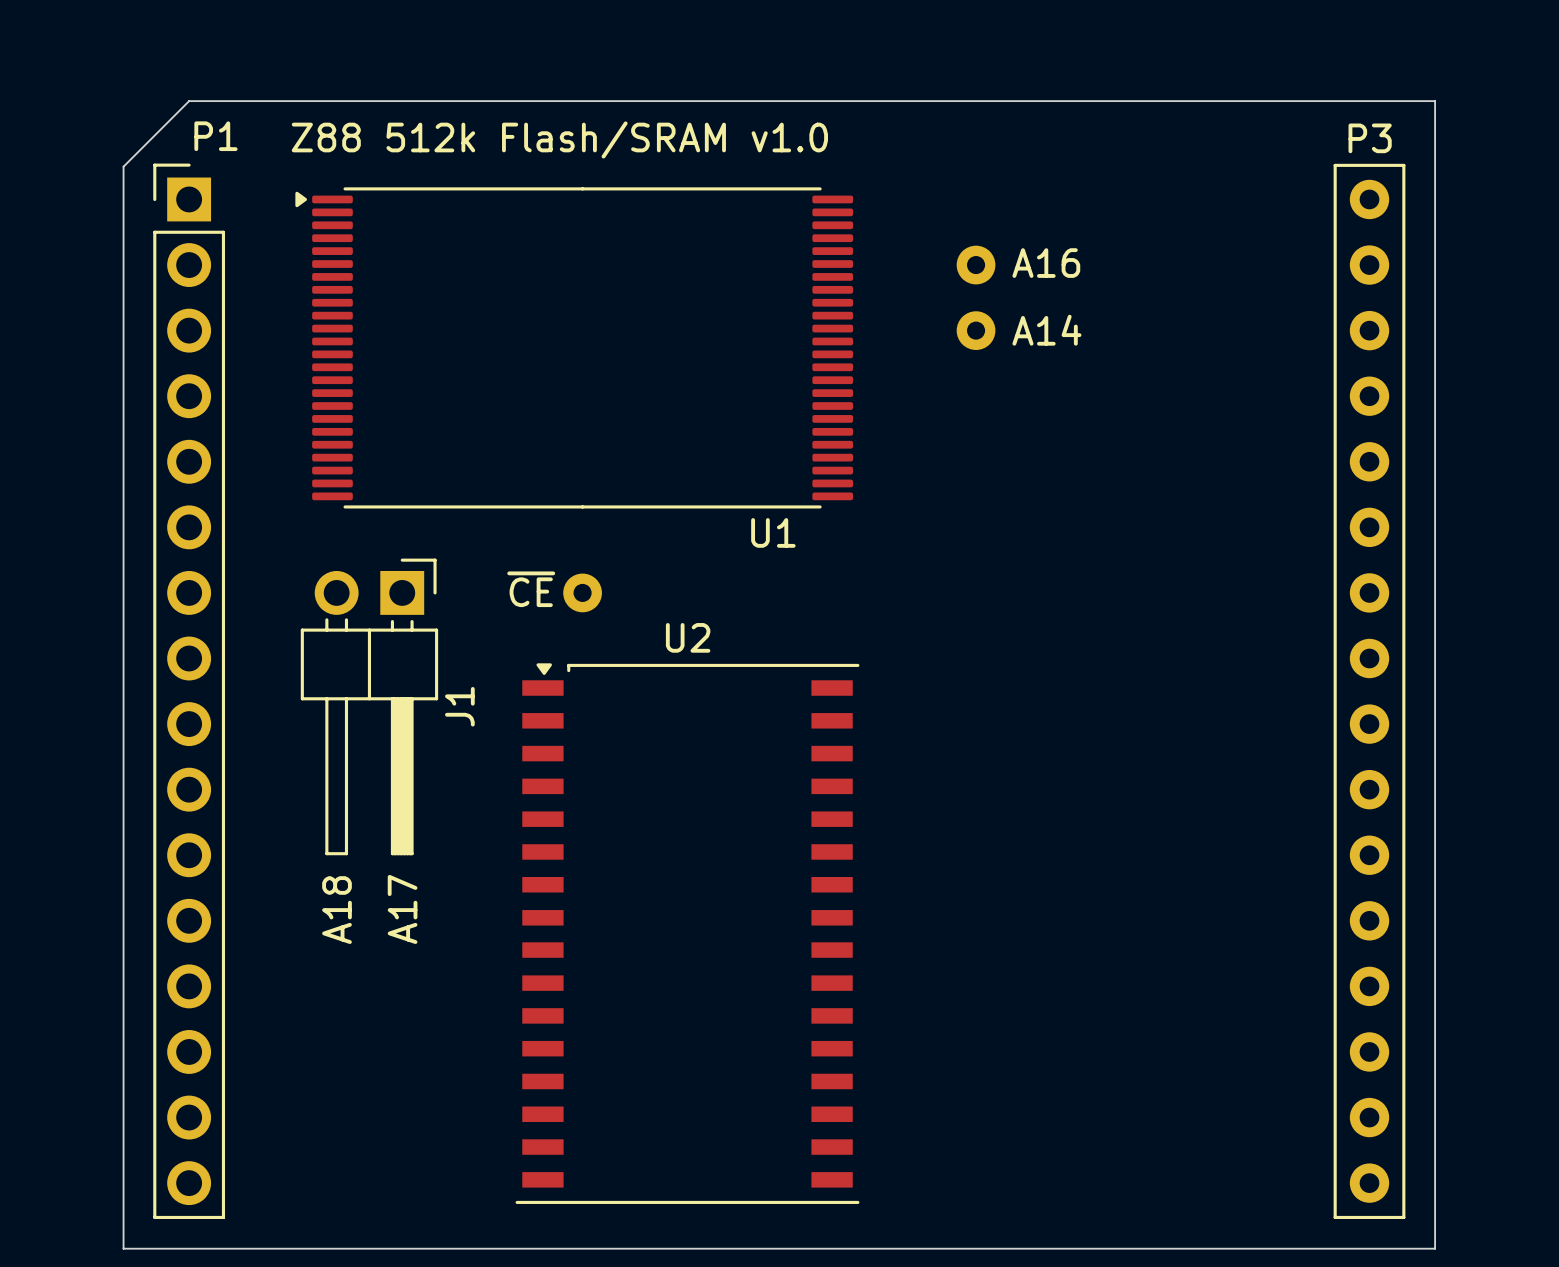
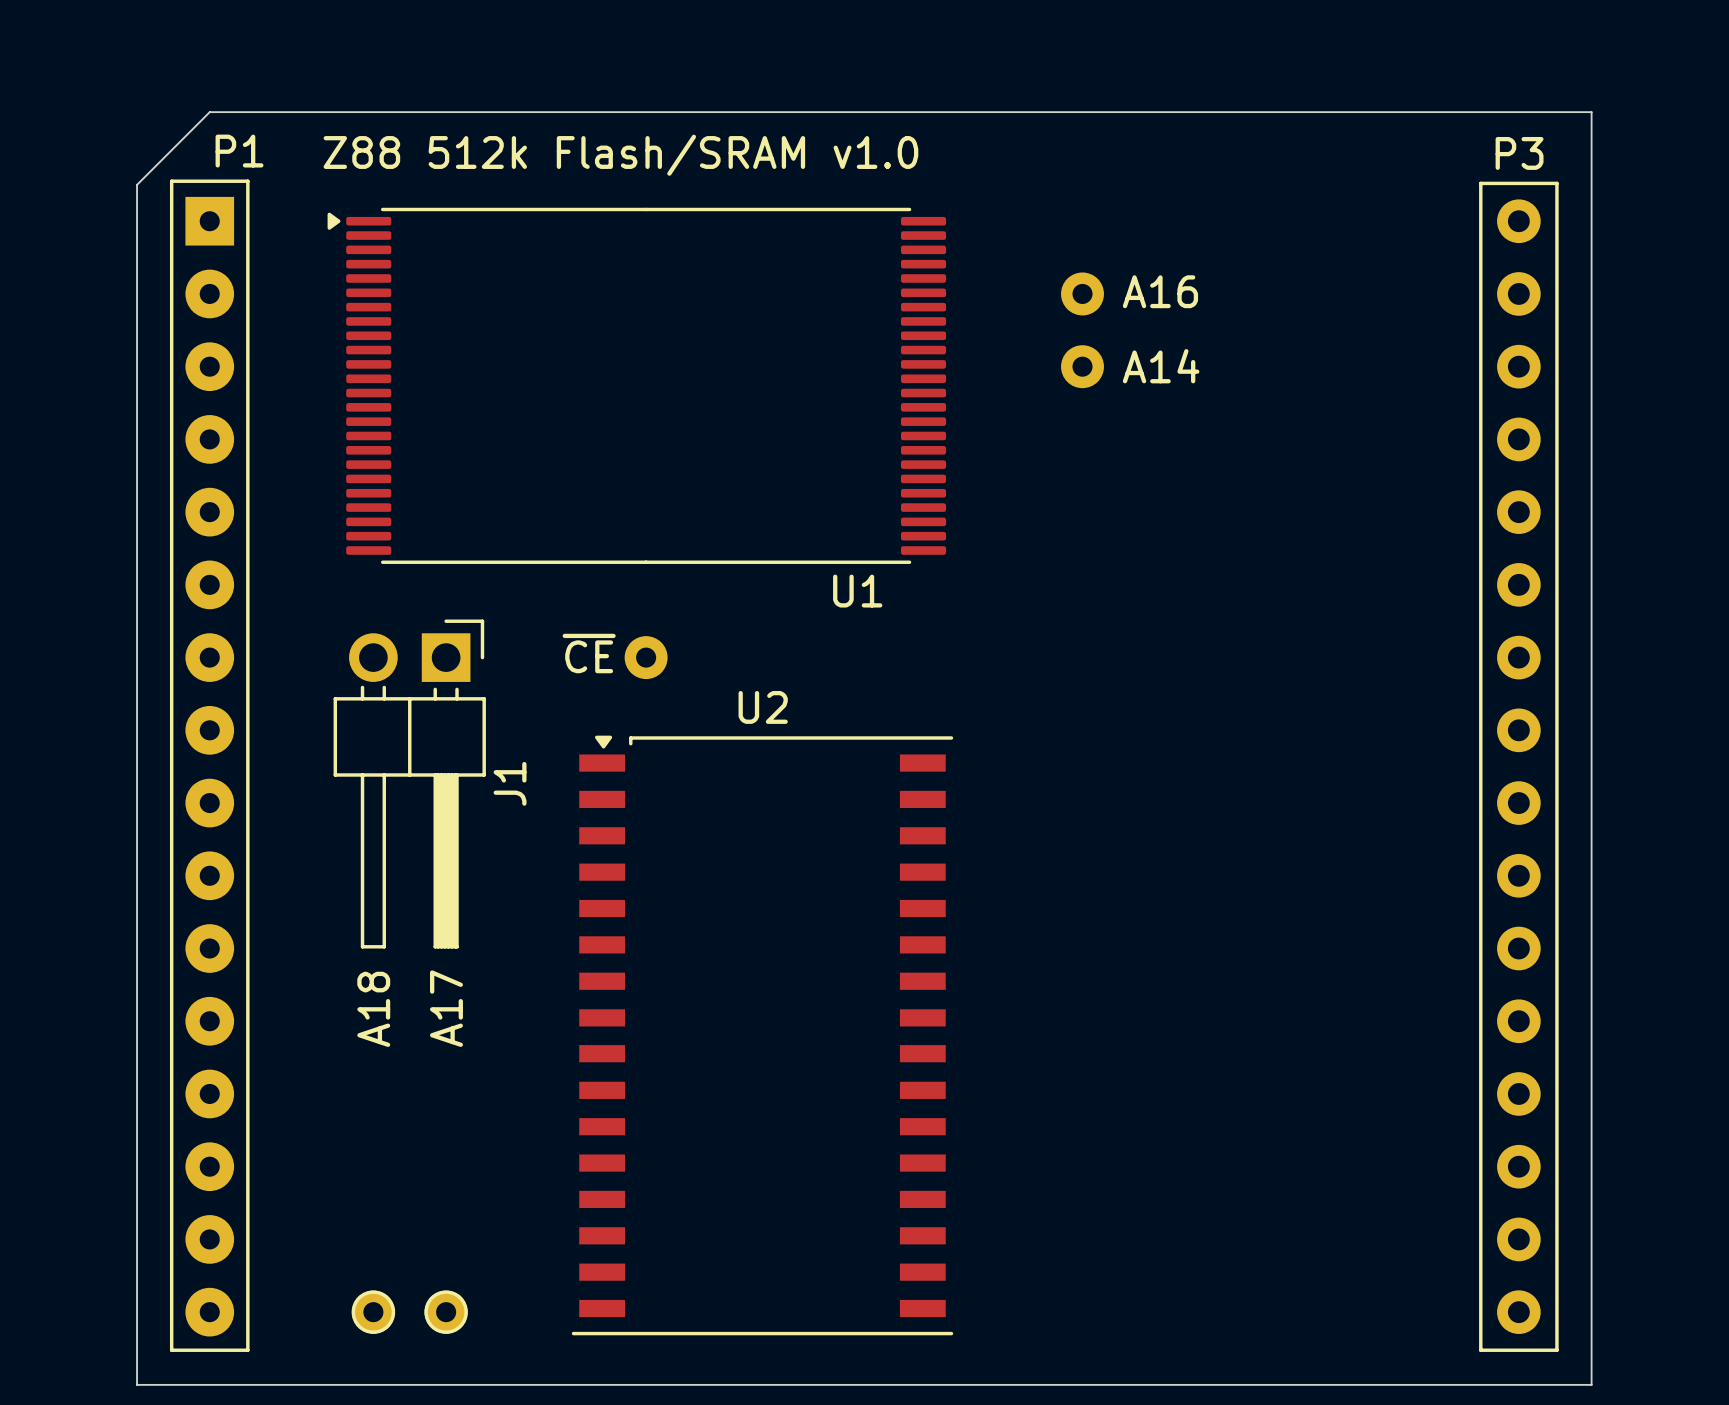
P1 footprint: [153, 163, 226, 1220] -> [169, 179, 250, 1352]
part: none -> (373, 1312)
part: none -> (446, 1312)

